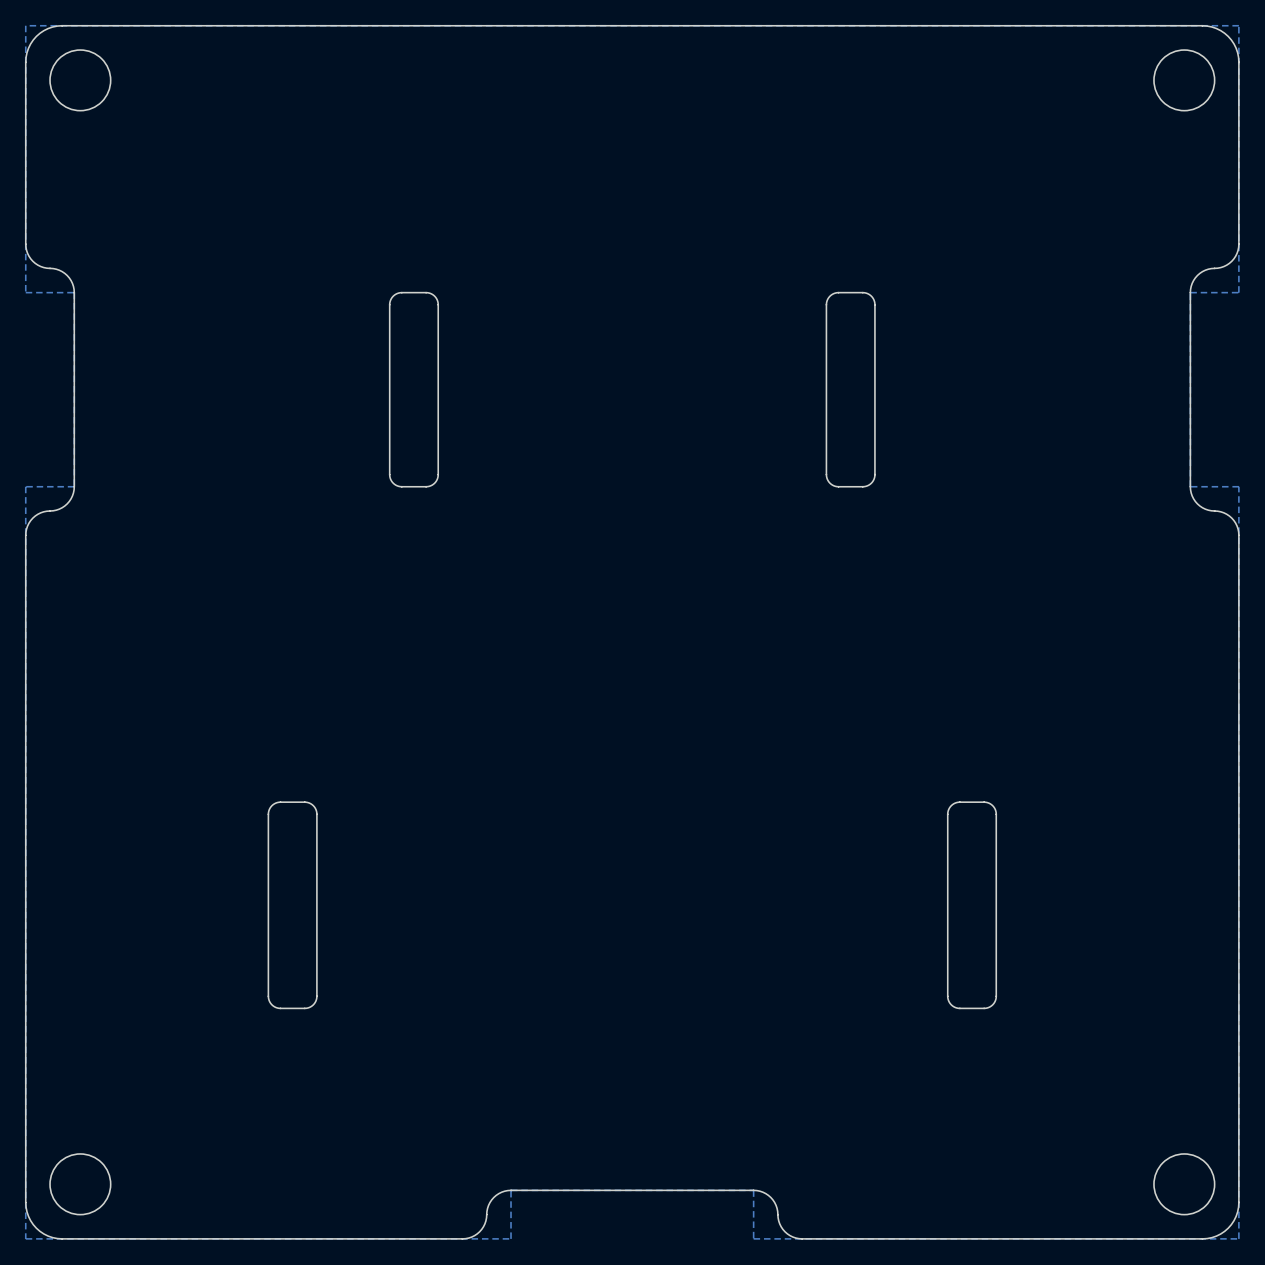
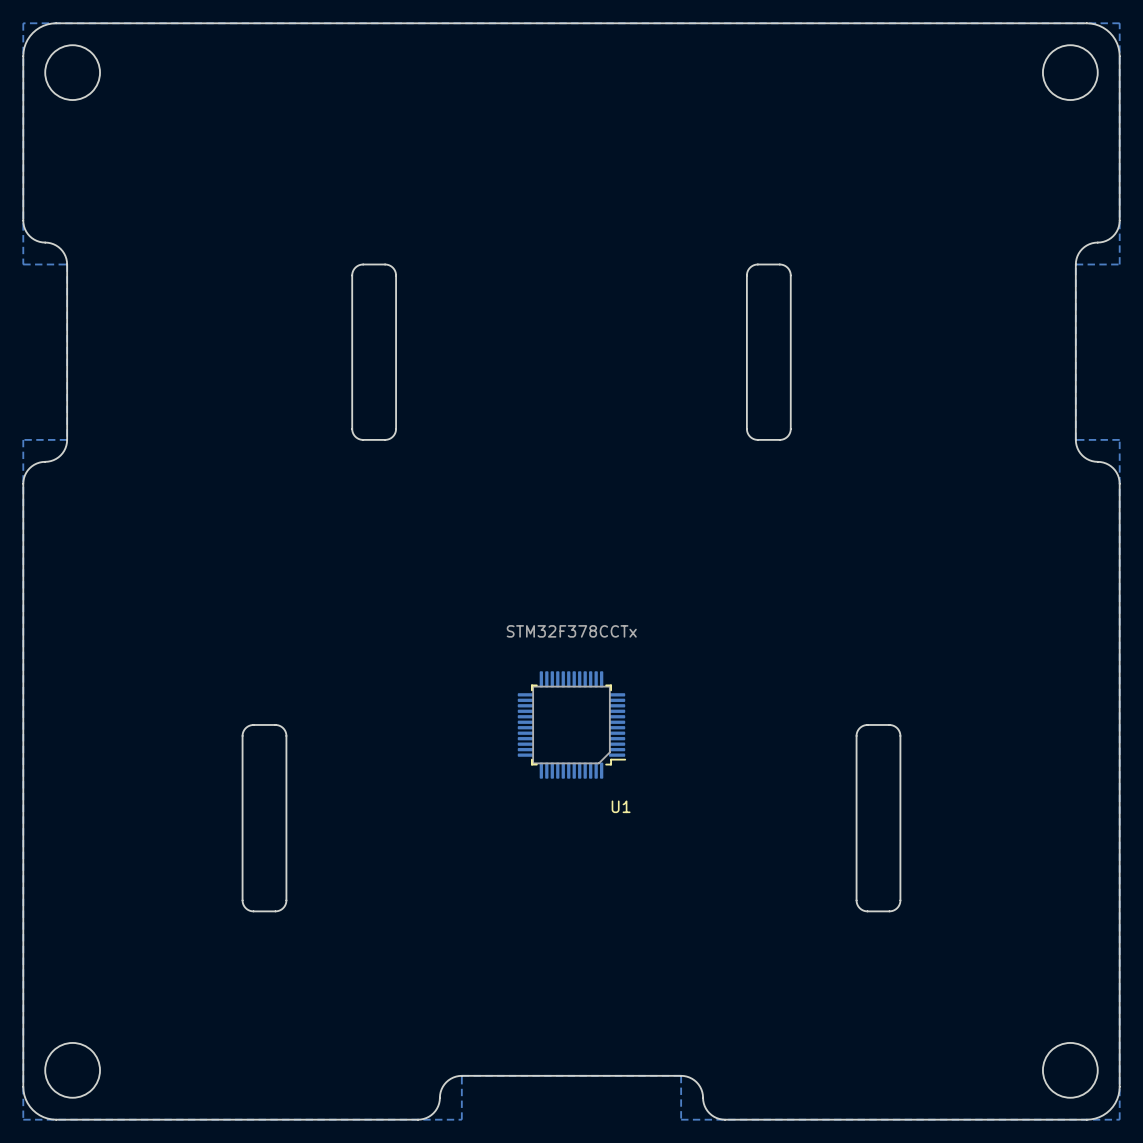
U1: none -> STM32F378CCTx (571, 724)

